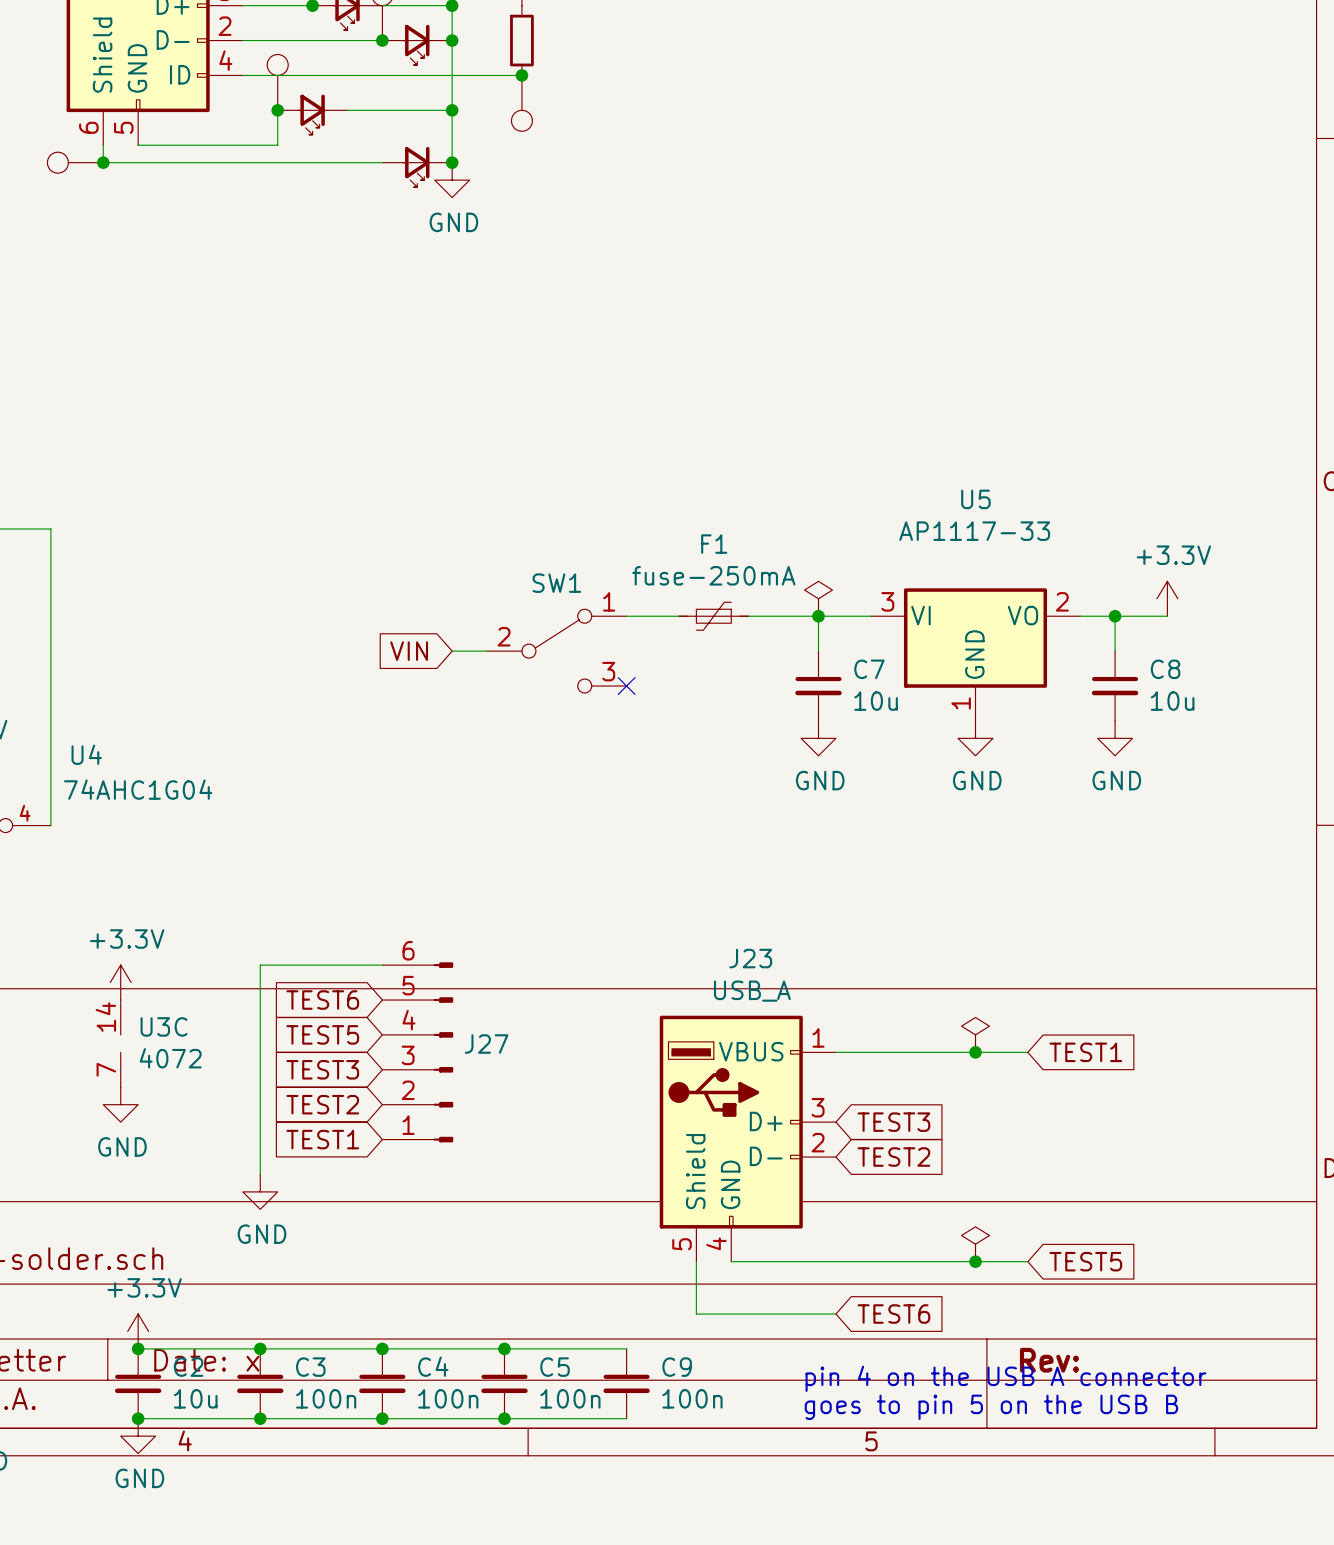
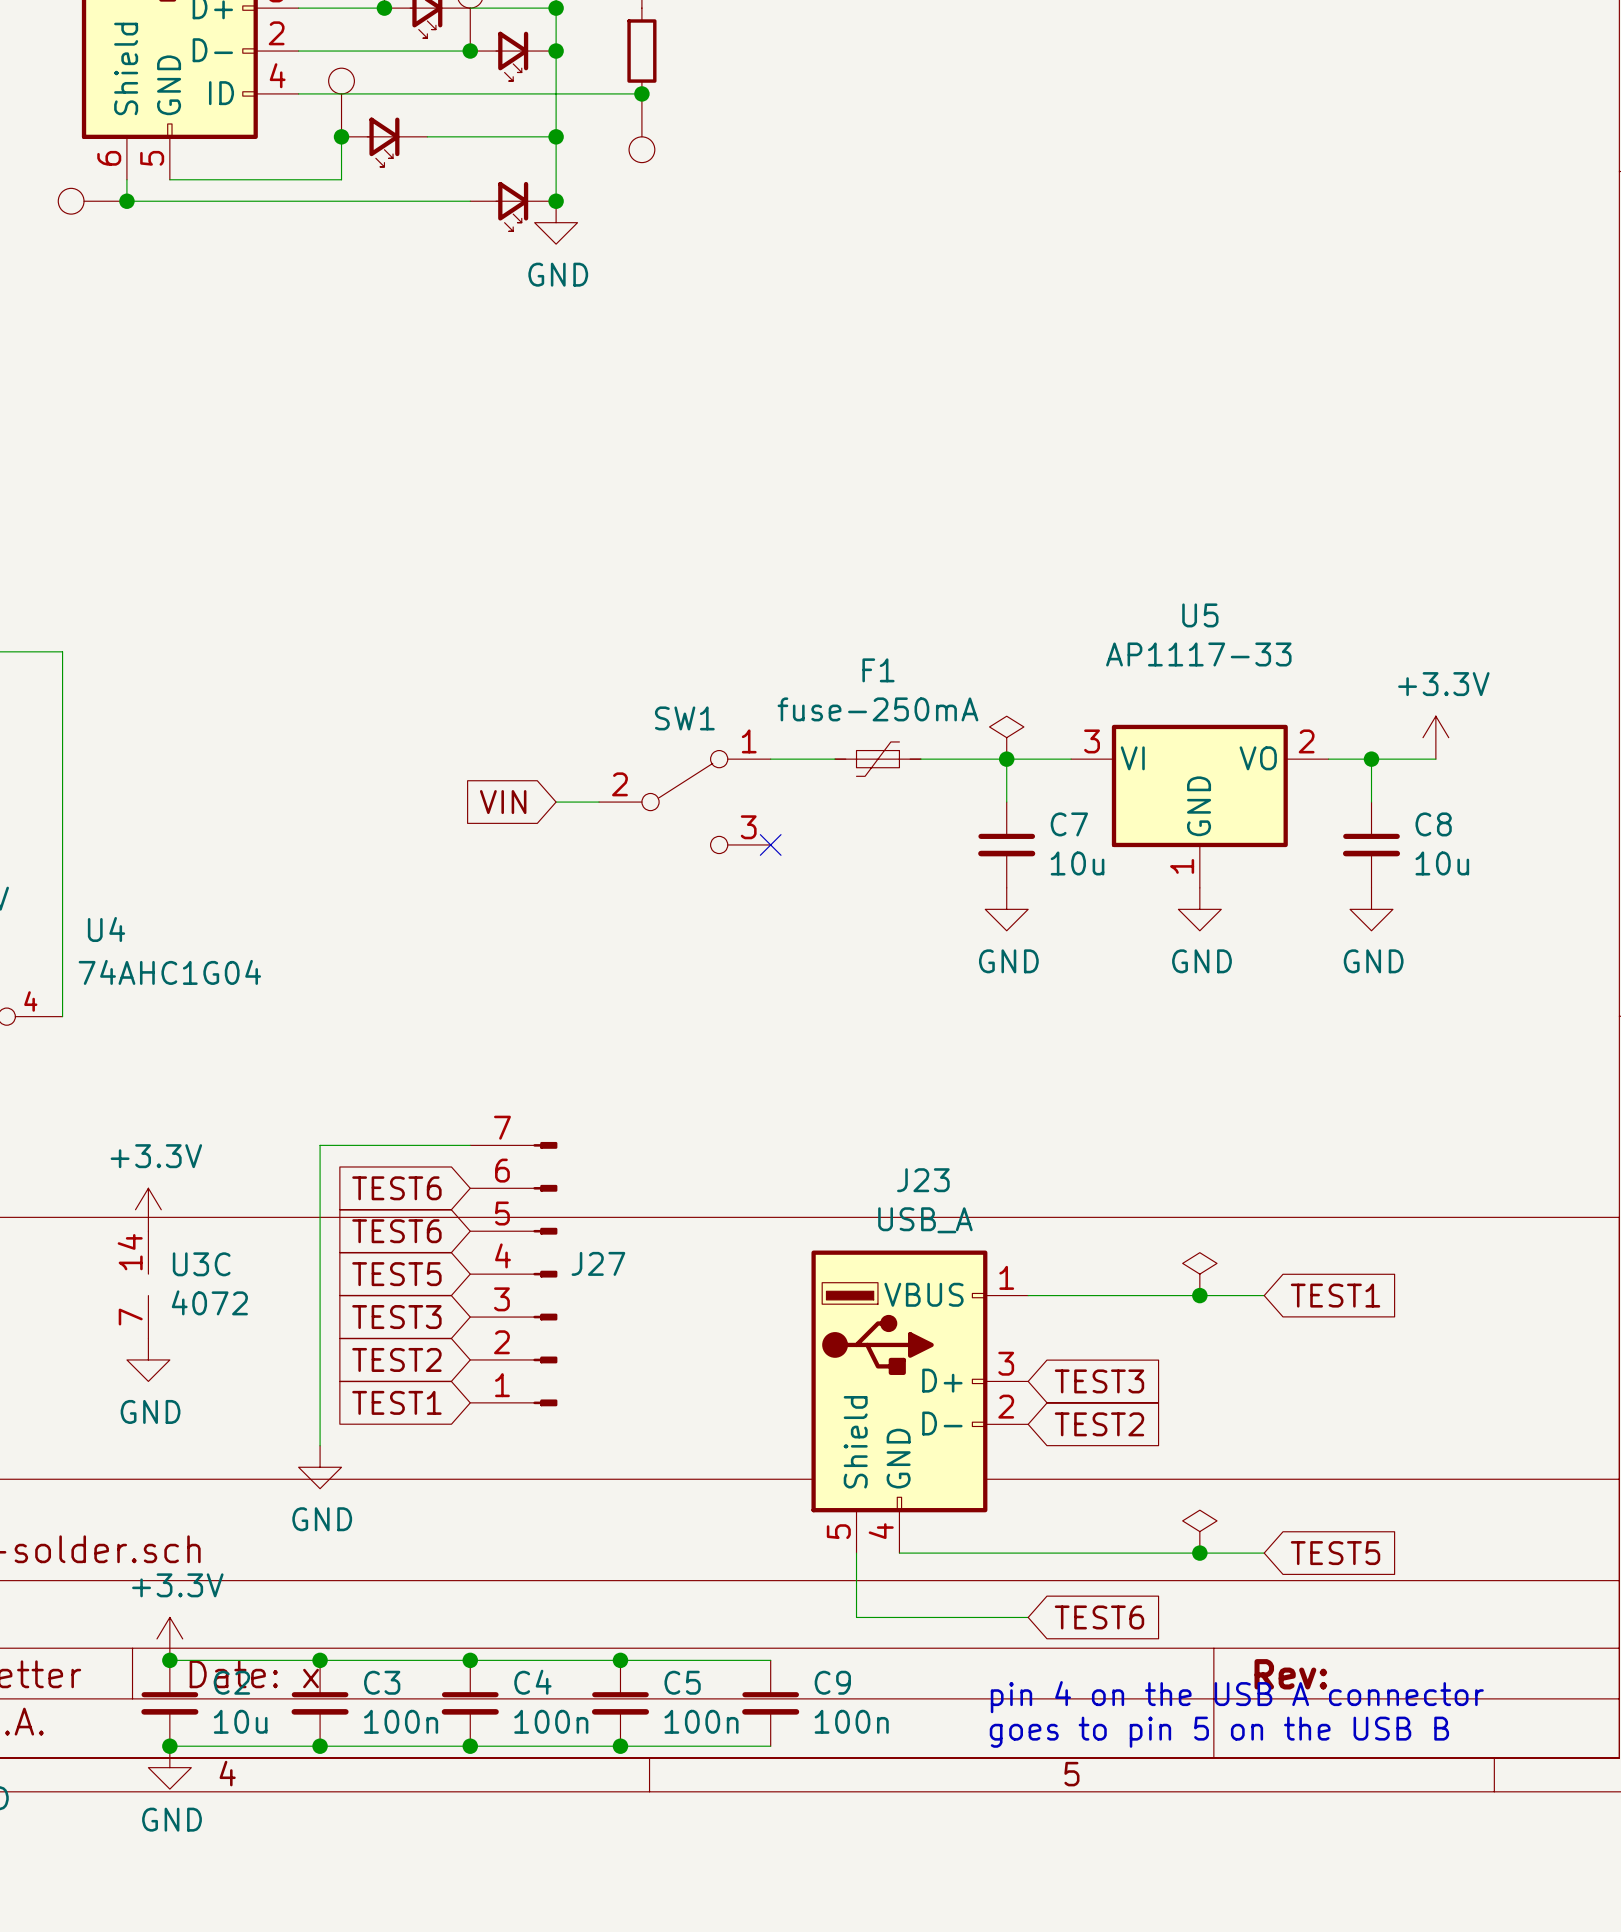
J27 symbol: [382, 962, 454, 1143] -> [470, 1141, 558, 1407]
wire: (260, 965) (382, 965) -> (320, 1188) (320, 1145) (470, 1145)
global label: none -> TEST6 (396, 1188)

